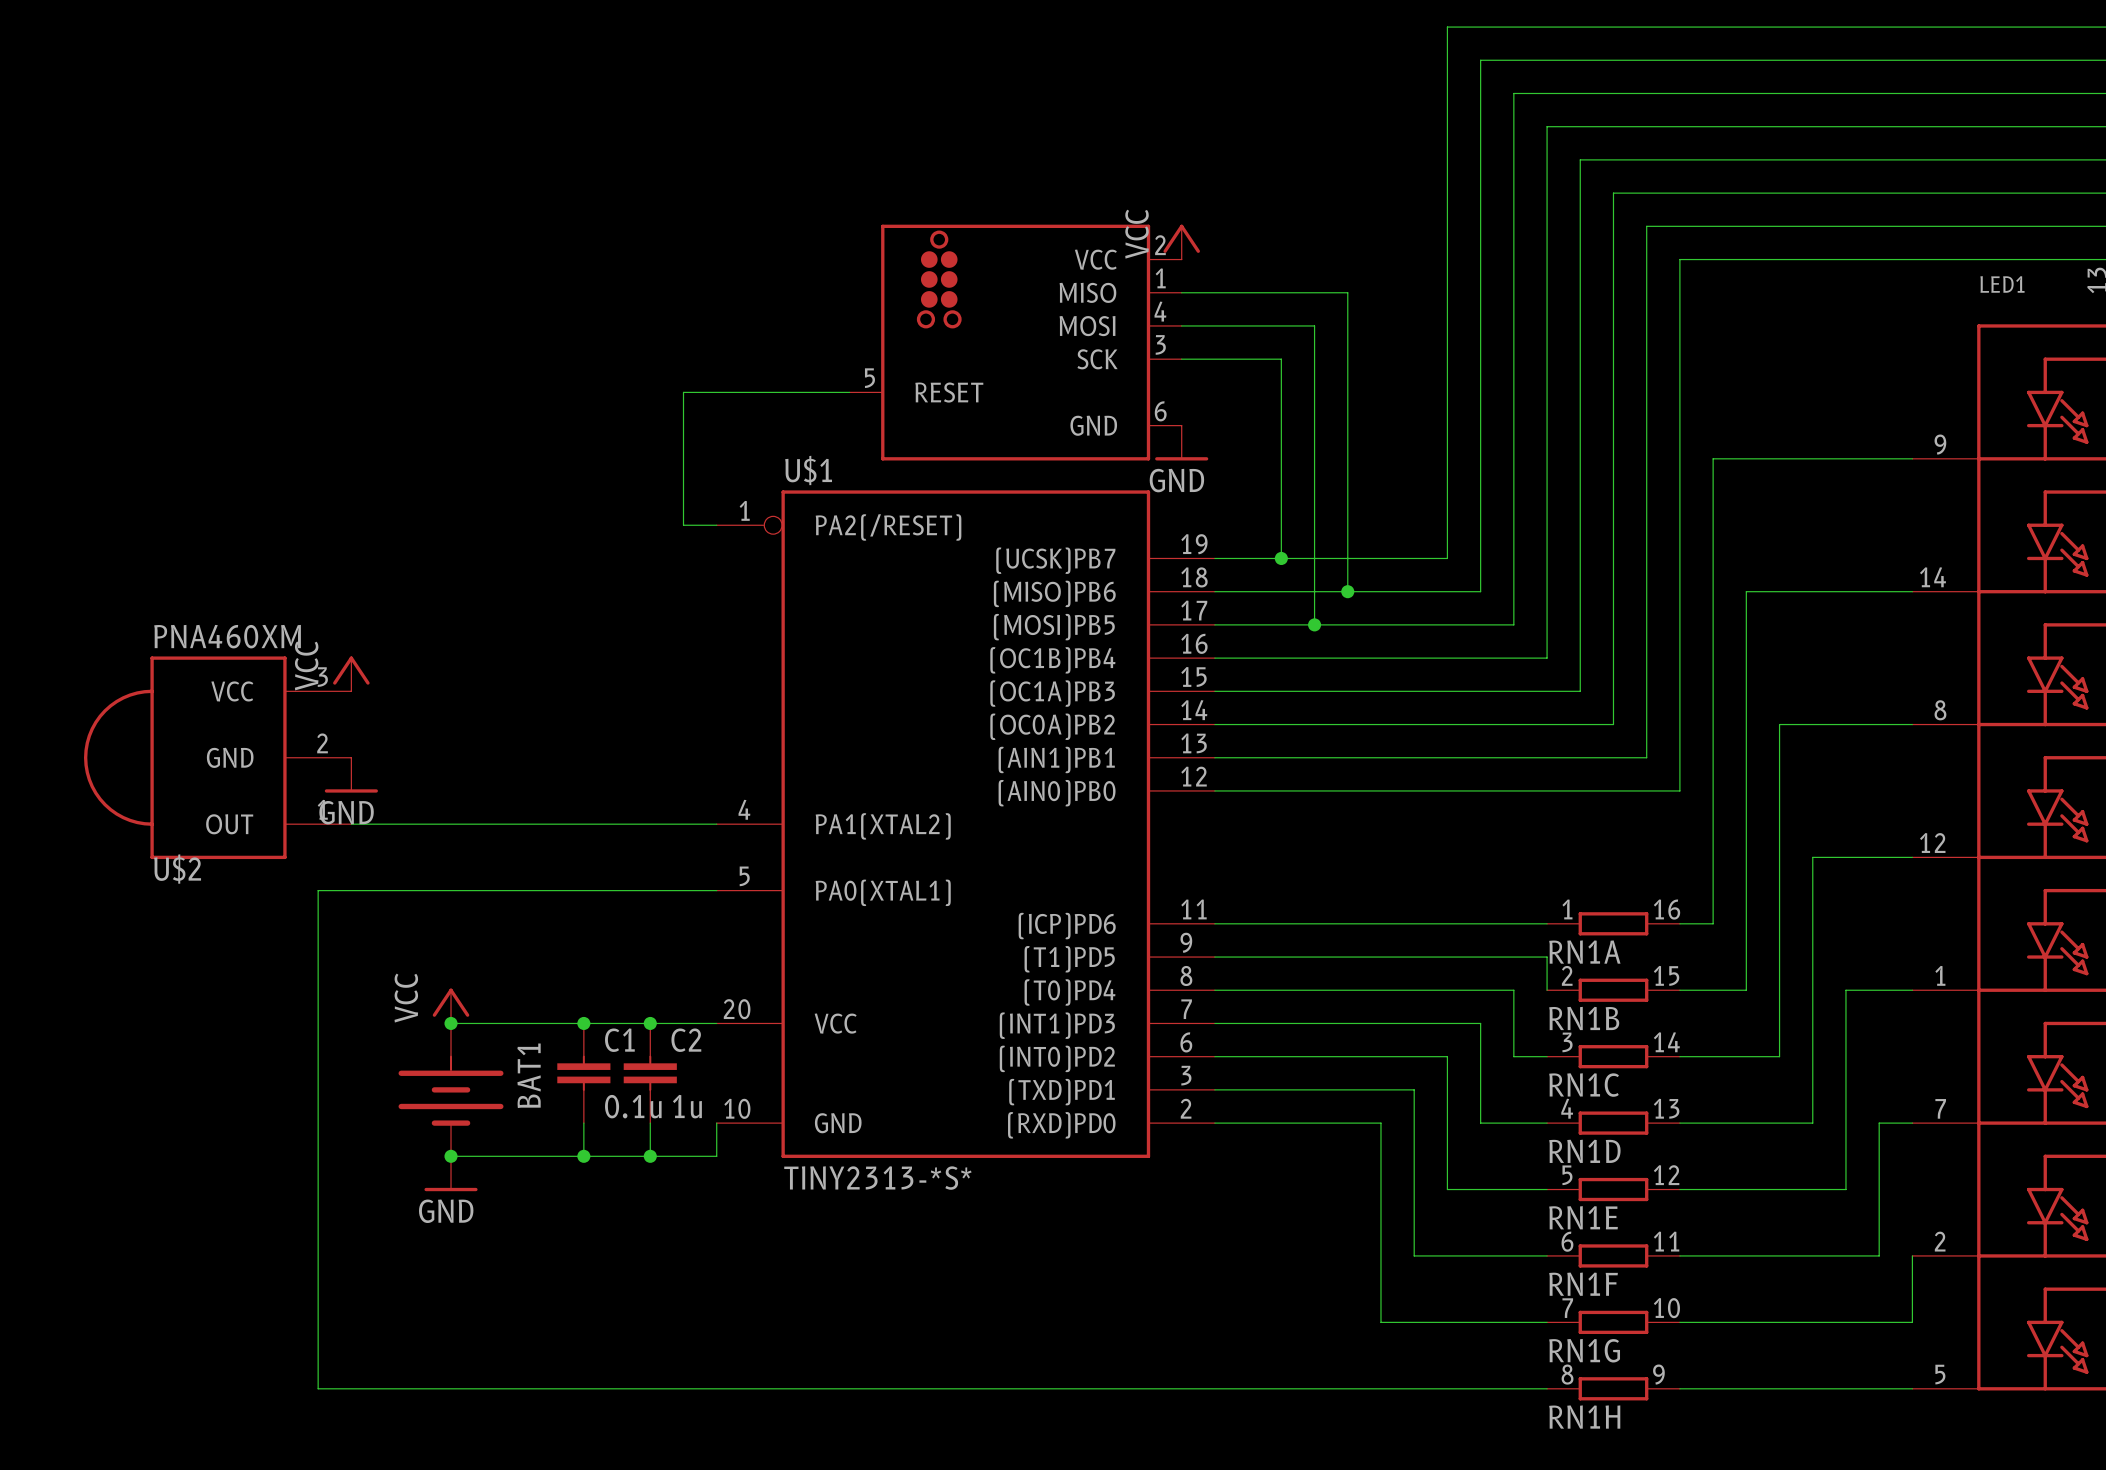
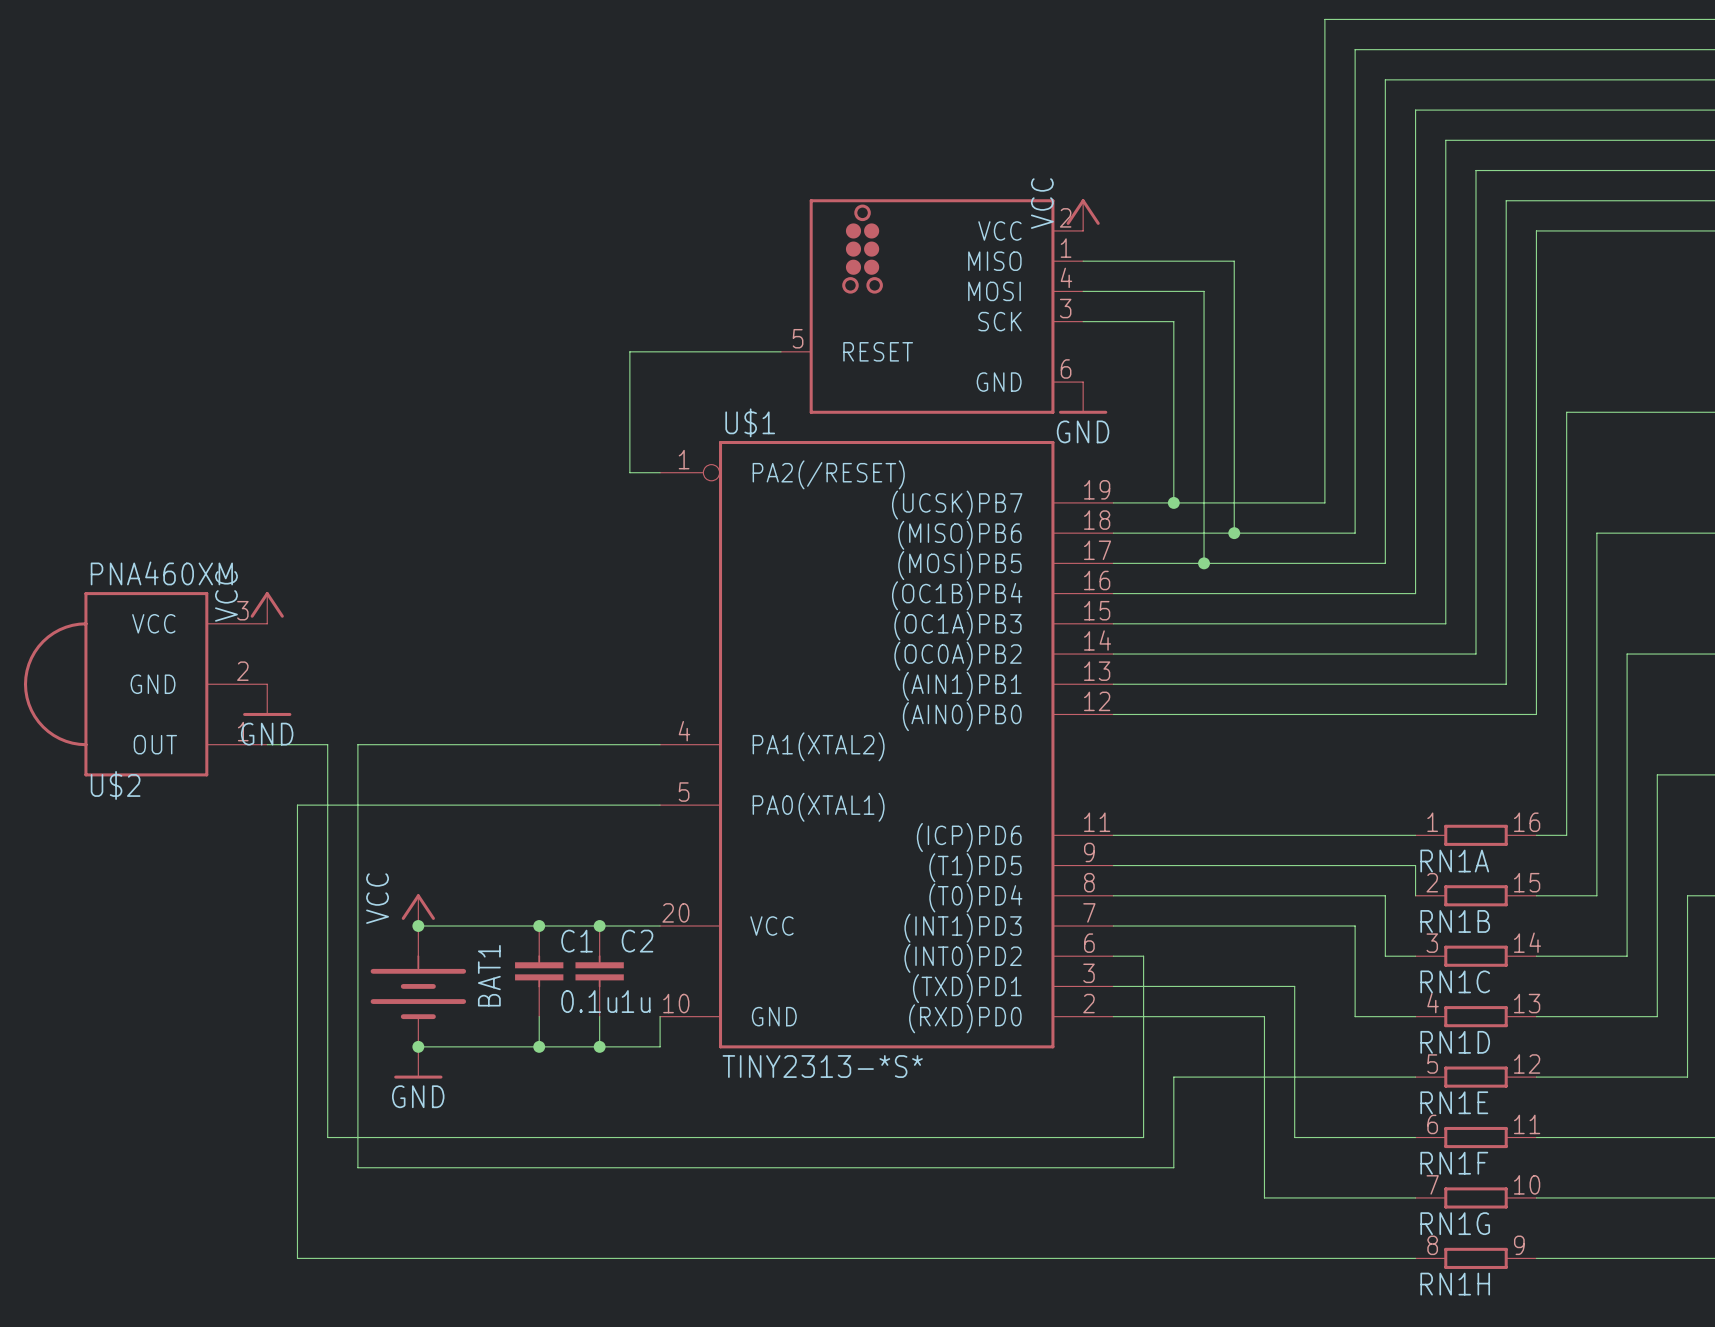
power symbol position: VCC (351, 673) -> VCC (267, 607)
U$2 position: (217, 757) -> (145, 684)
power symbol position: GND (351, 775) -> GND (267, 700)
wire: none -> (267, 744) (327, 744) (327, 1137) (1143, 1137) (1143, 956)
wire: (351, 824) (384, 824) -> none
wire: (1248, 1056) (1447, 1056) (1447, 1189) -> (357, 744) (357, 1167) (1173, 1167) (1173, 1077) (1324, 1077)

